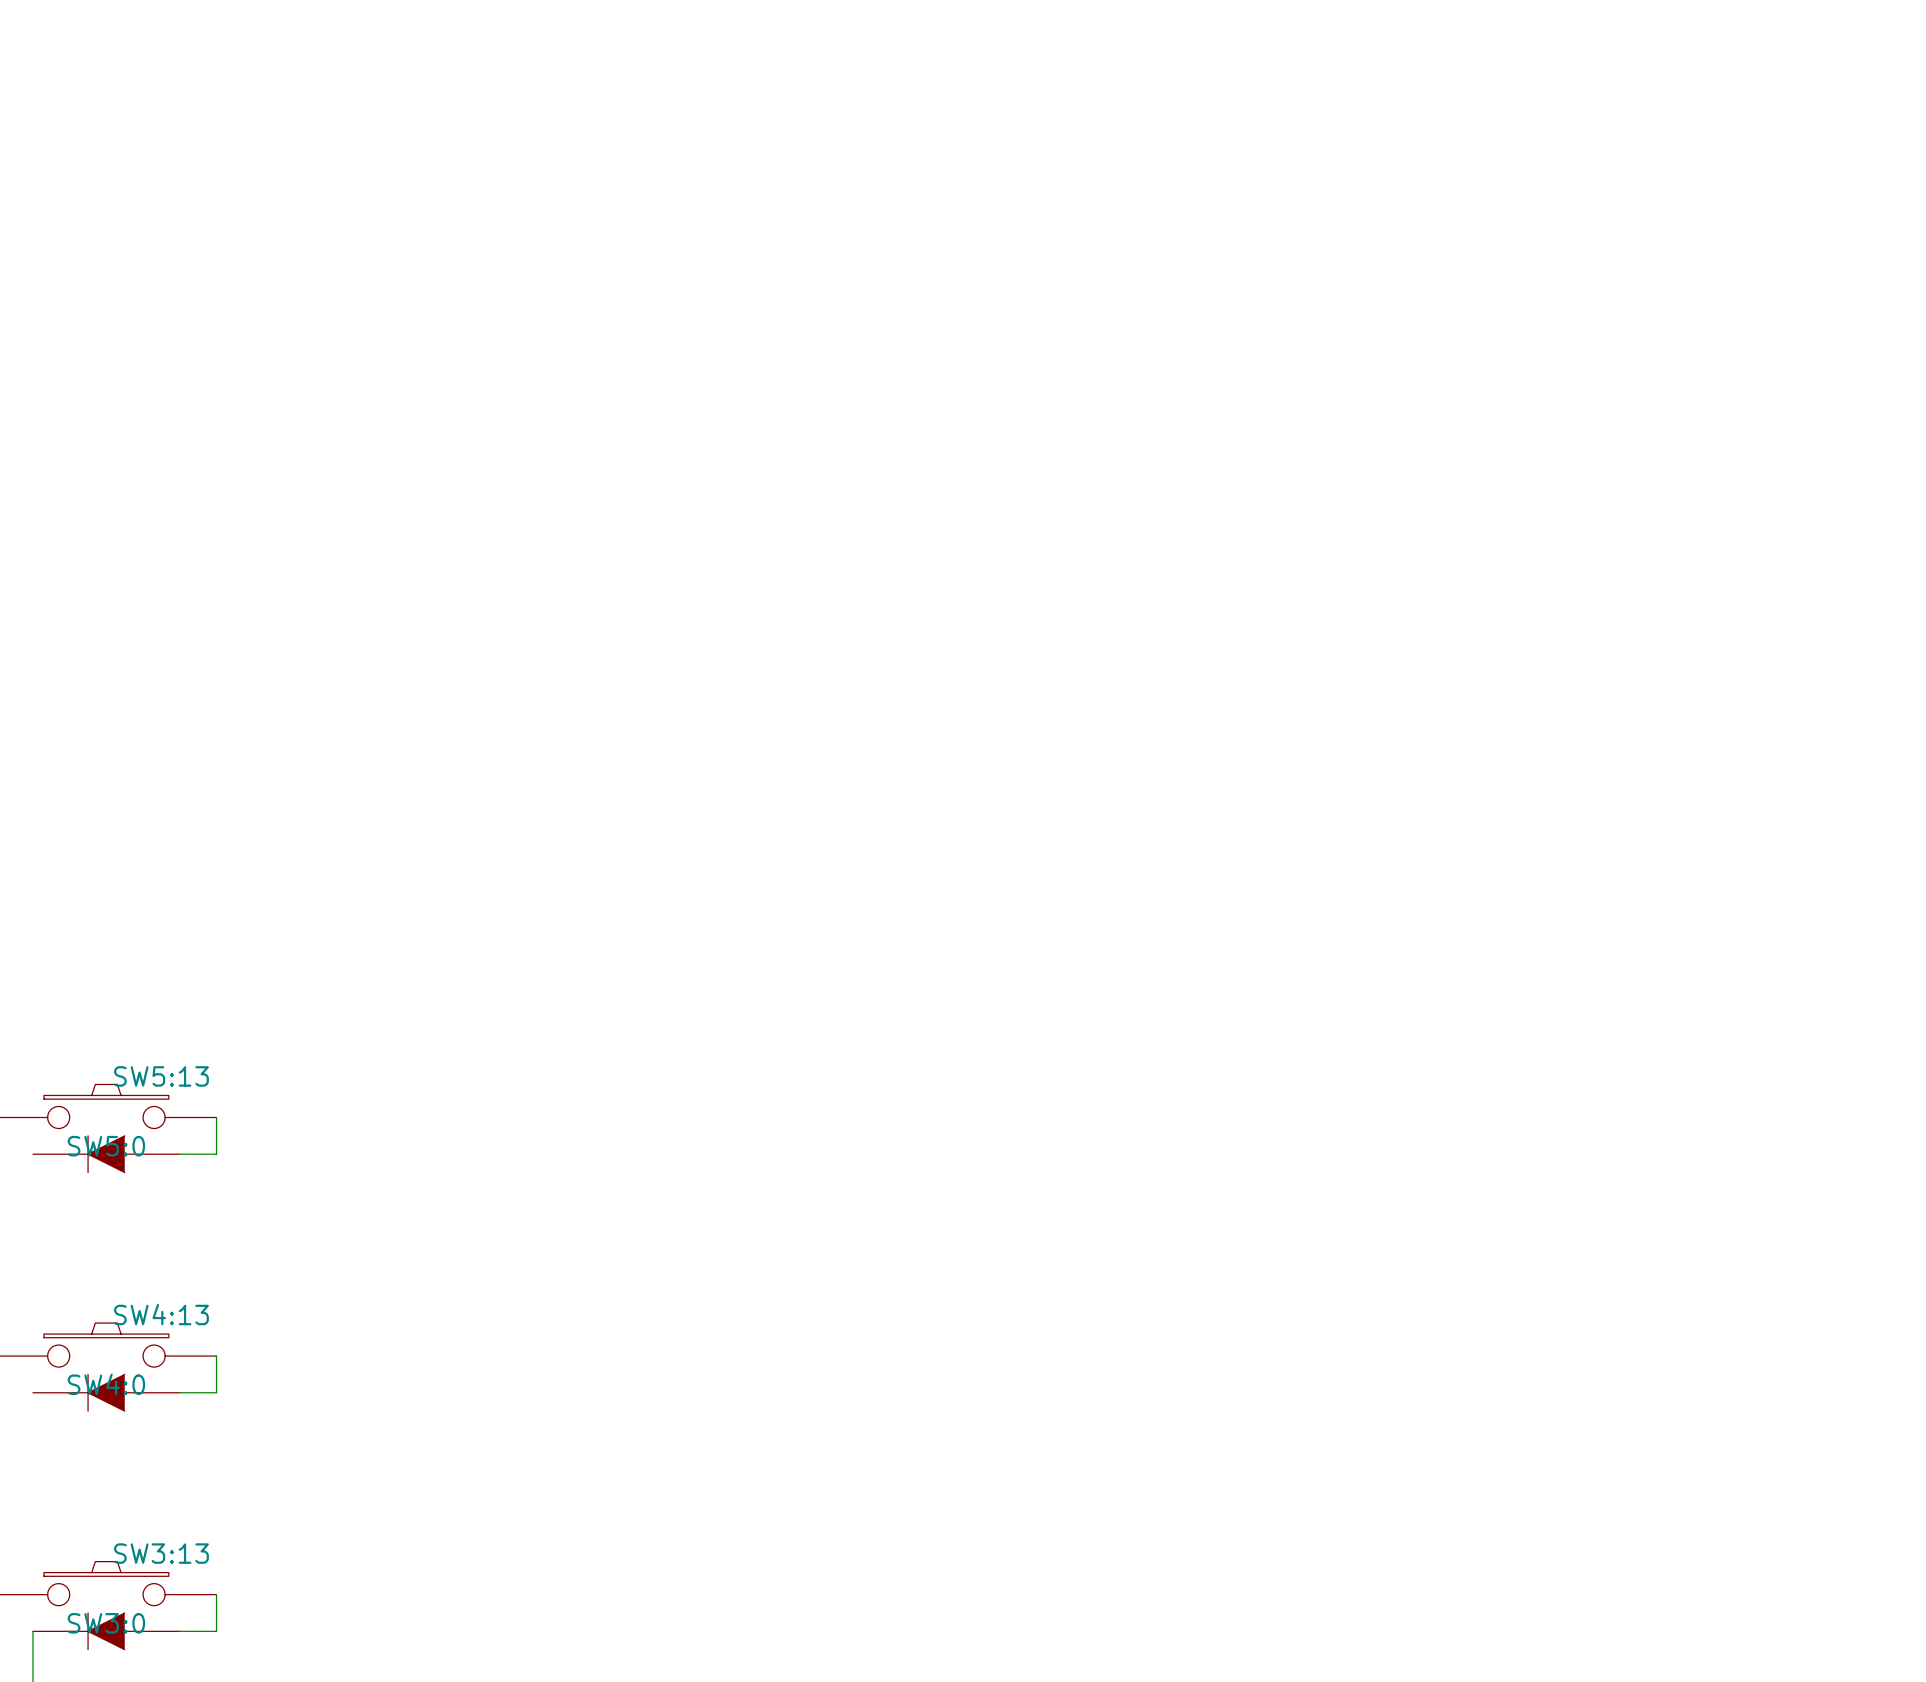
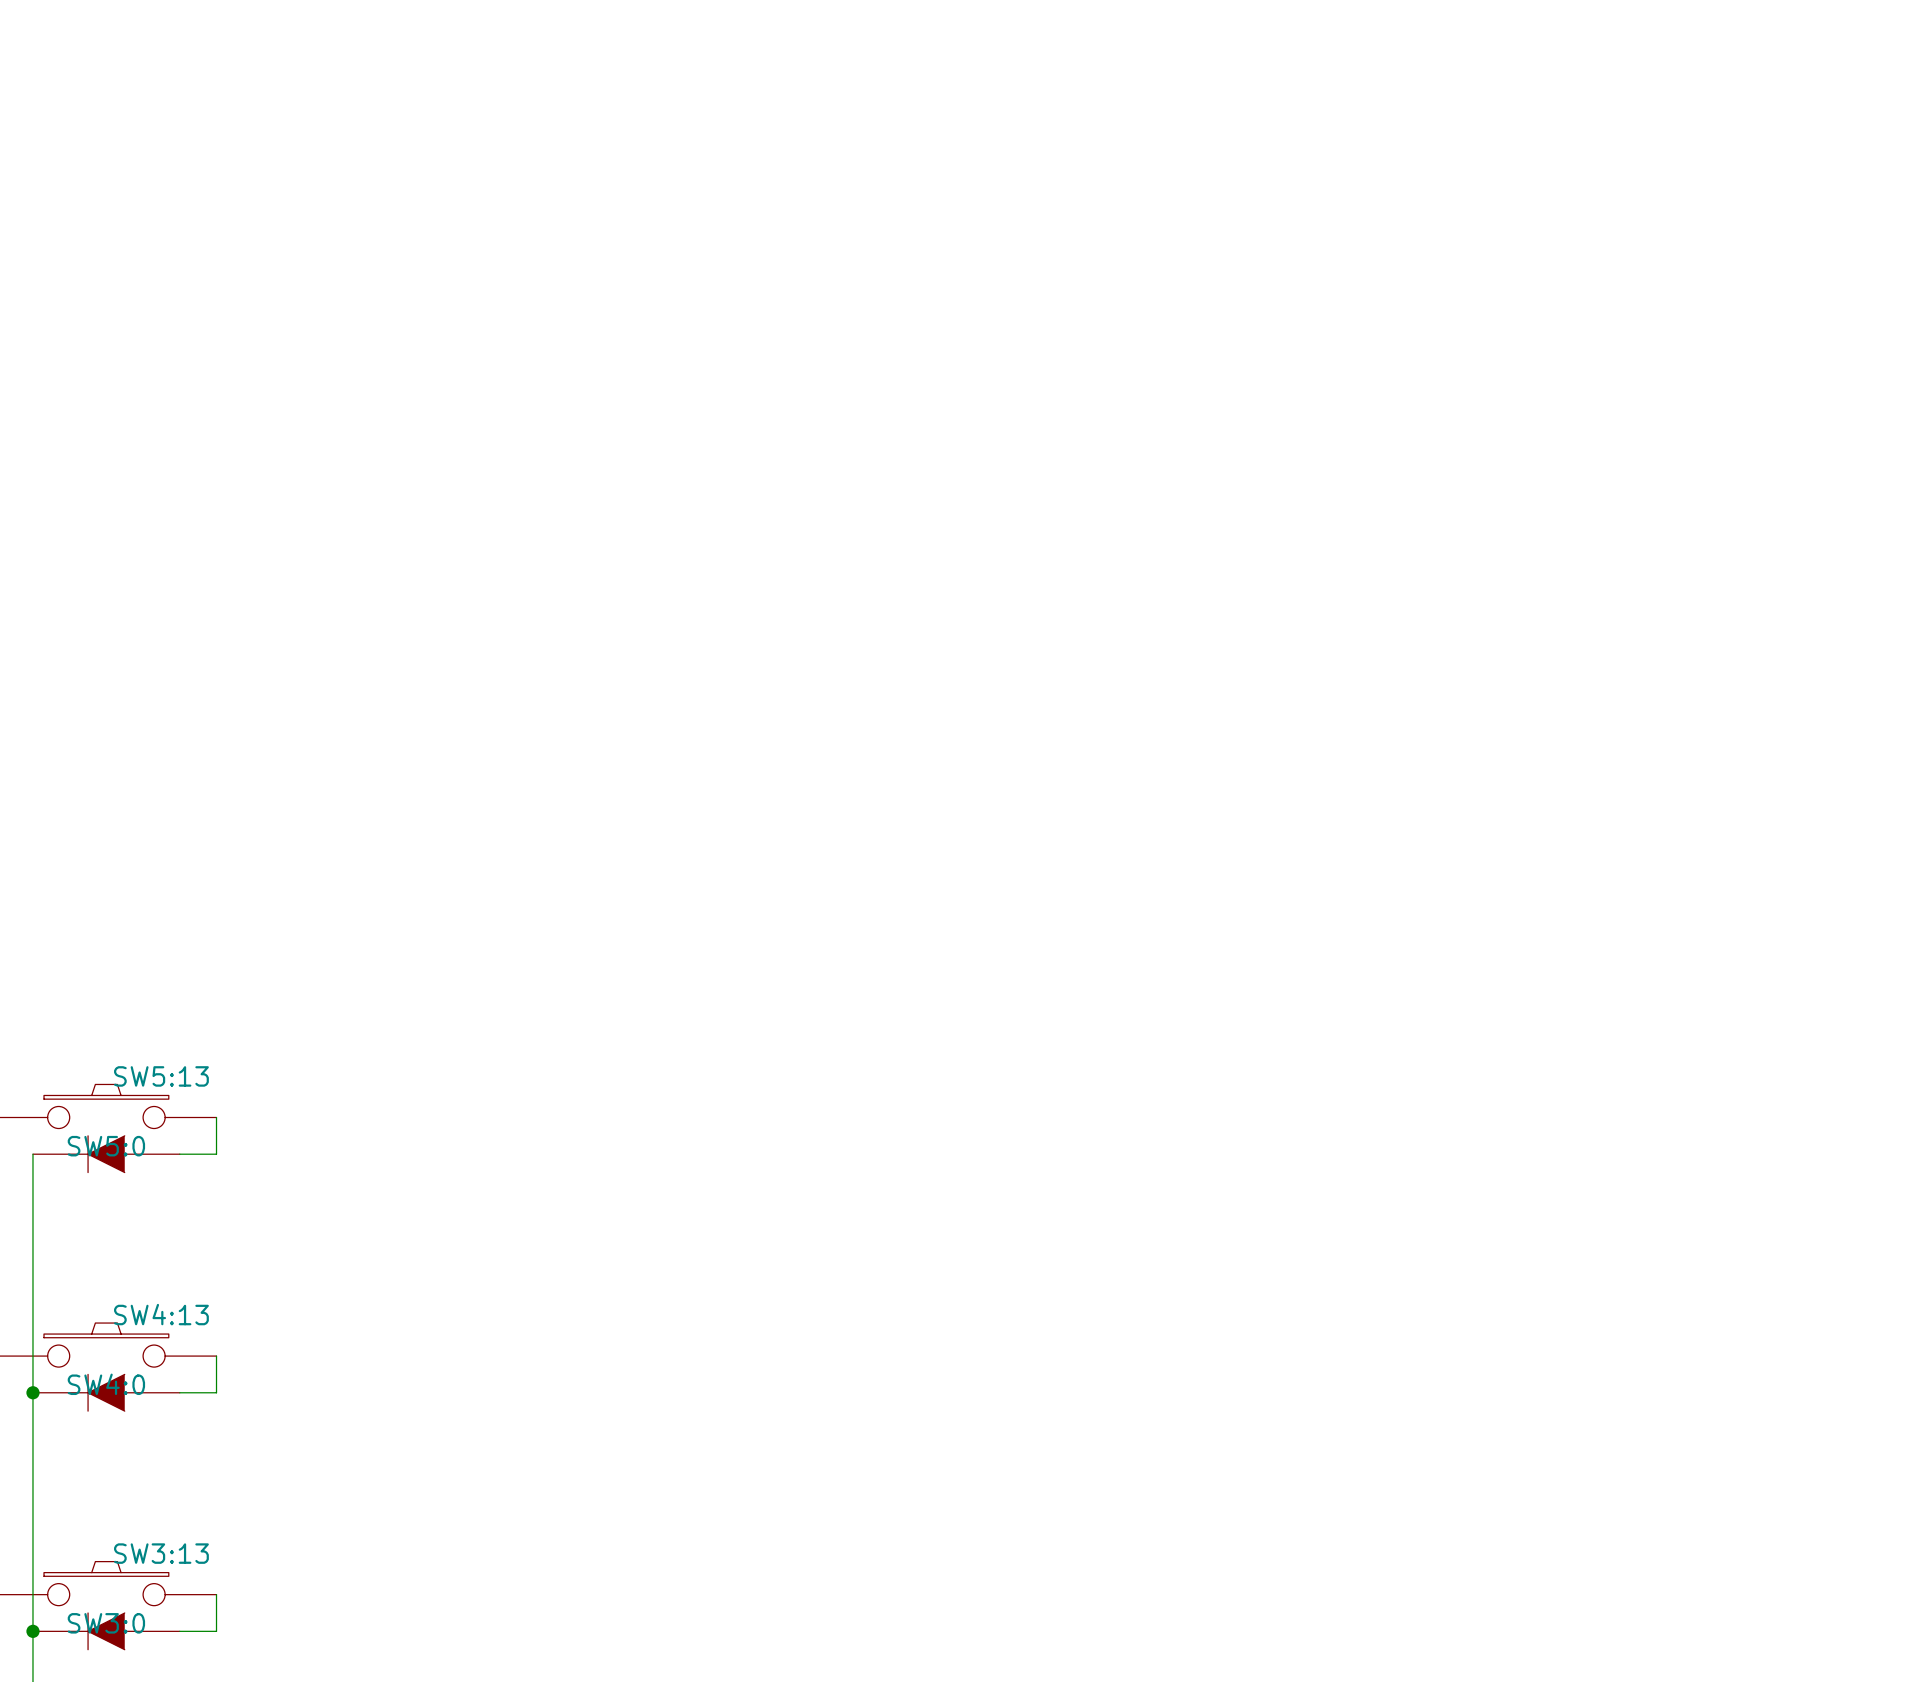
wire: none -> (32, 1154) (32, 1631)
junction: none -> (32, 1392)
junction: none -> (32, 1631)

